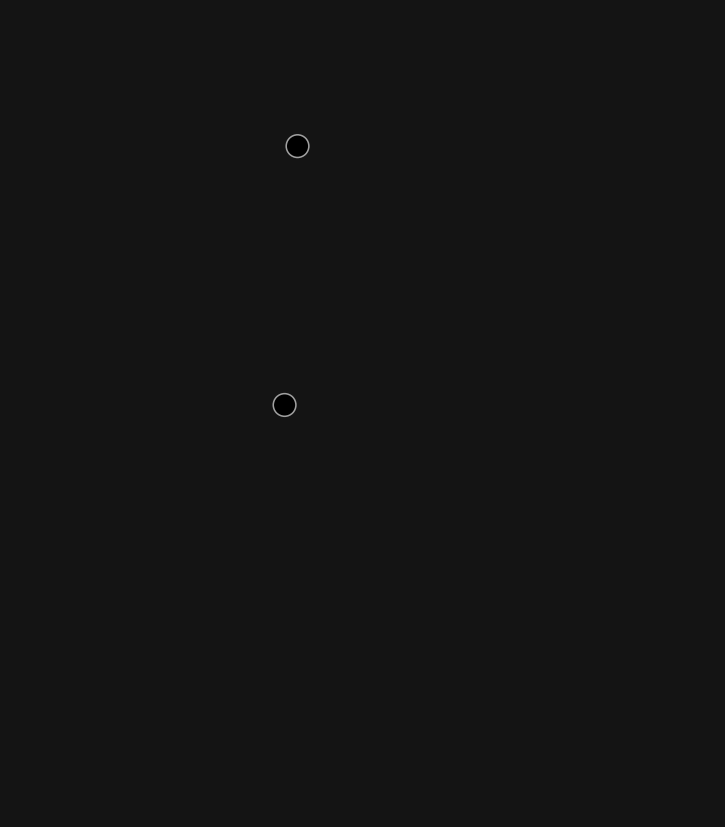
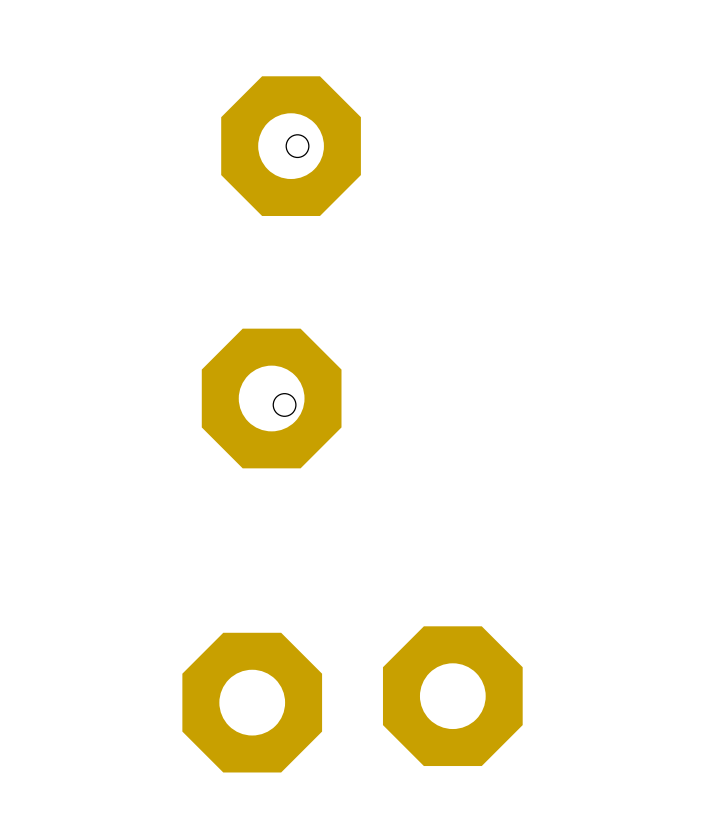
part: none -> (291, 146)
part: none -> (271, 398)
part: none -> (452, 696)
part: none -> (252, 702)

